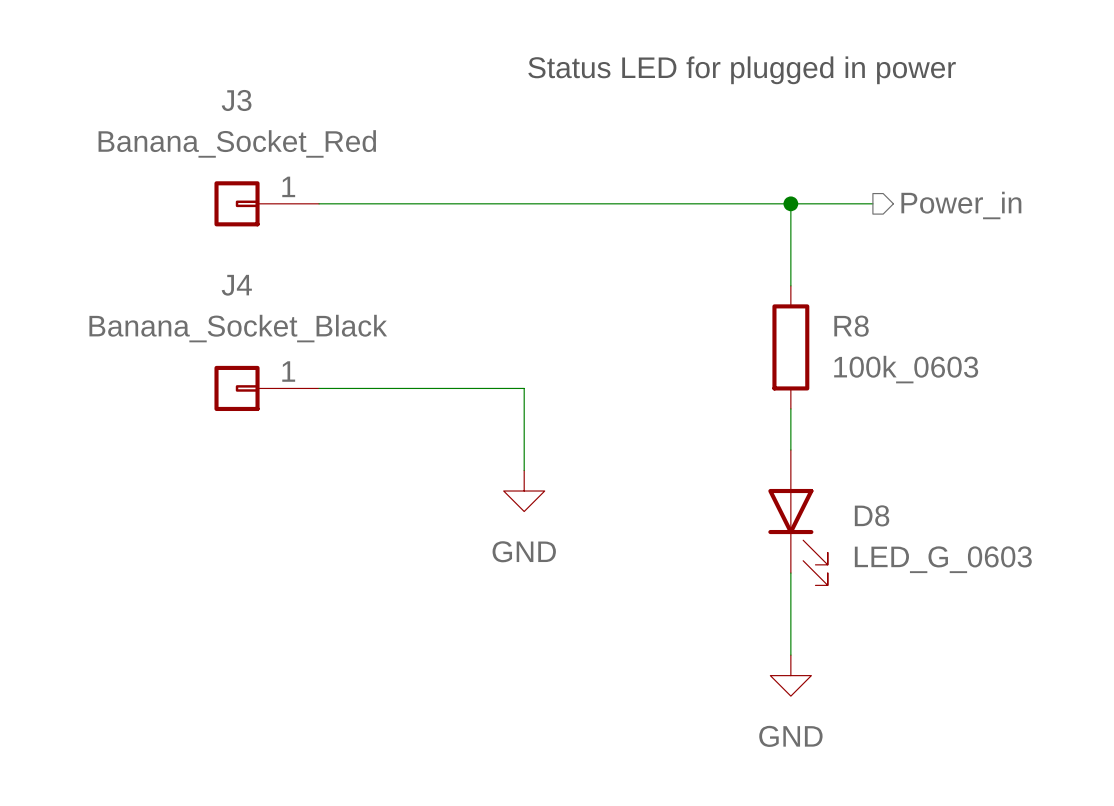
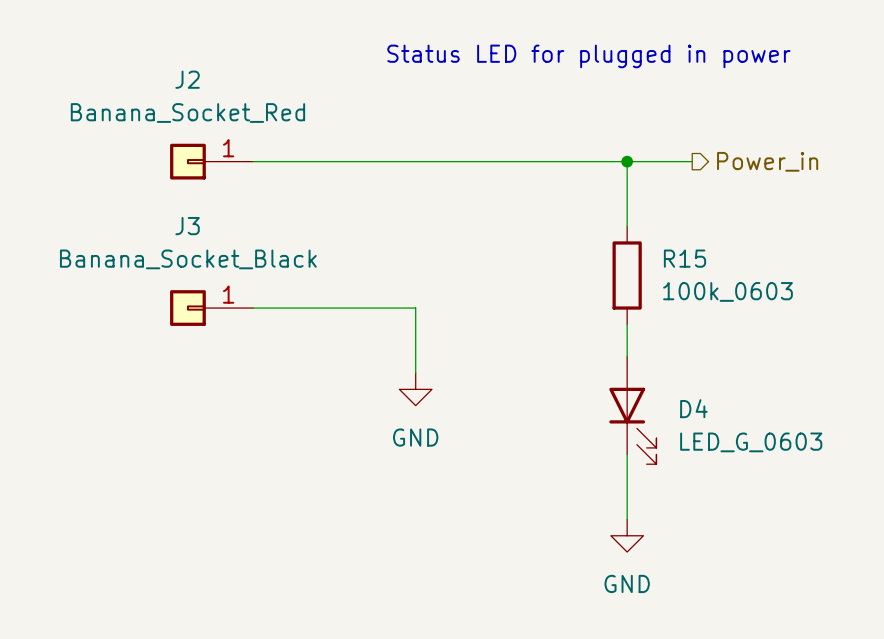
J3 name: J3 (236, 100) -> J2 (187, 79)
J4 name: J4 (236, 285) -> J3 (187, 226)
R8 name: R8 (851, 326) -> R15 (684, 258)
D8 name: D8 (872, 515) -> D4 (693, 408)

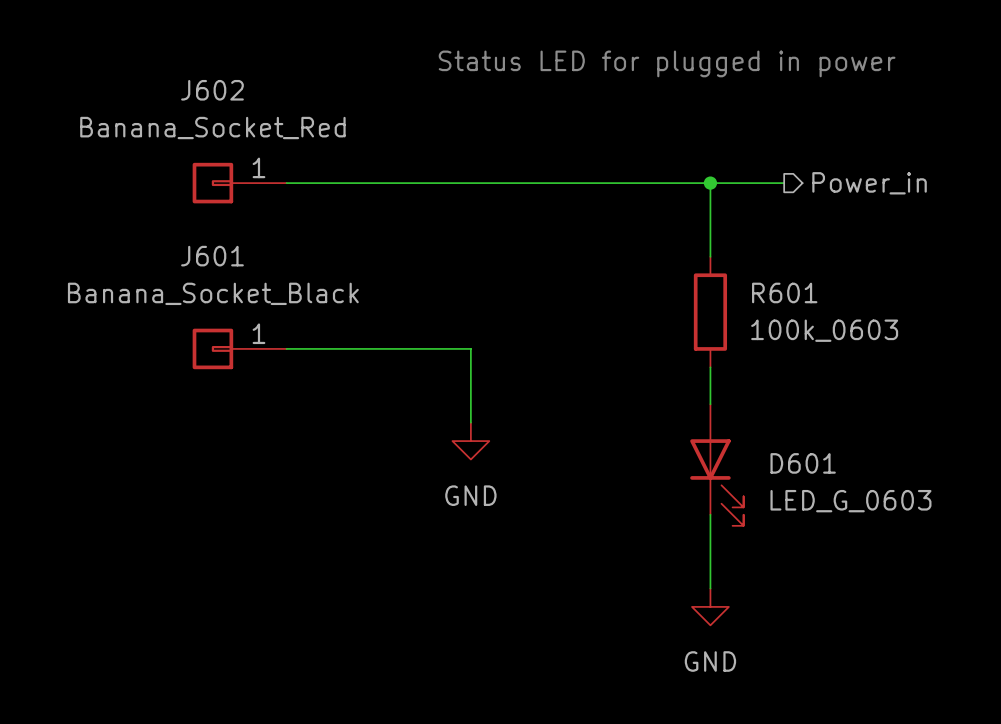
J2 name: J2 (187, 79) -> J602 (212, 90)
J3 name: J3 (187, 226) -> J601 (212, 256)
R15 name: R15 (684, 258) -> R601 (784, 292)
D4 name: D4 (693, 408) -> D601 (803, 463)

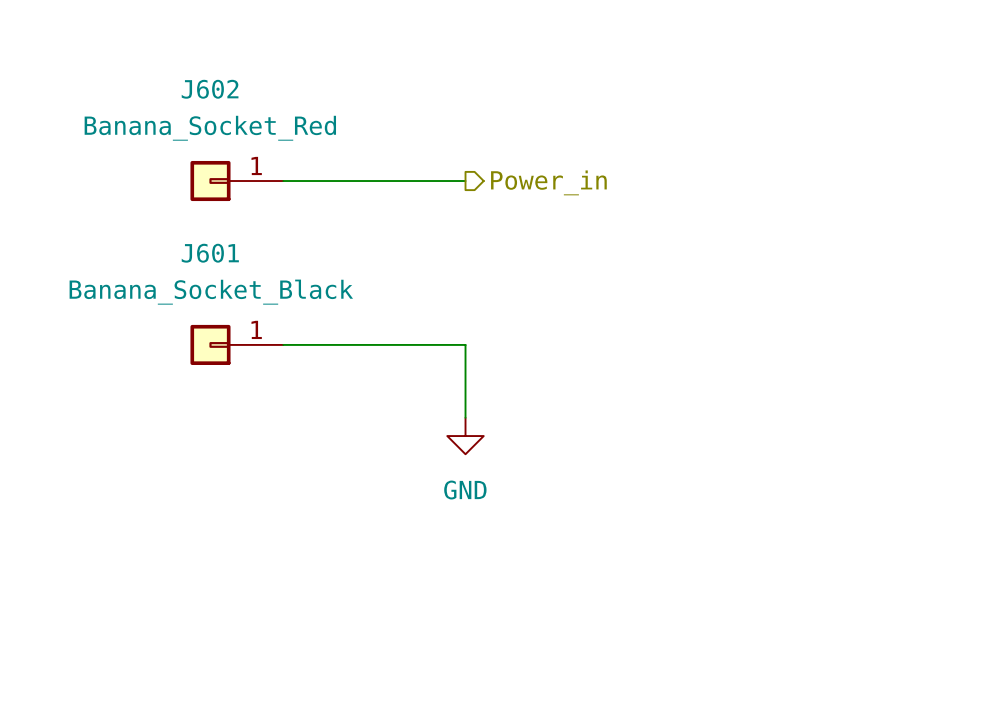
text: Status LED for plugged in power (667, 63) -> none
wire: (470, 183) (784, 183) -> none
wire: (710, 183) (710, 256) -> none
junction: (710, 183) -> none
hierarchical label position: Power_in (869, 183) -> Power_in (548, 182)
R601: 100k_0603 (710, 312) -> none
wire: (710, 367) (710, 404) -> none
D601: LED_G_0603 (716, 465) -> none
wire: (710, 514) (710, 588) -> none
power symbol: GND (710, 606) -> none

